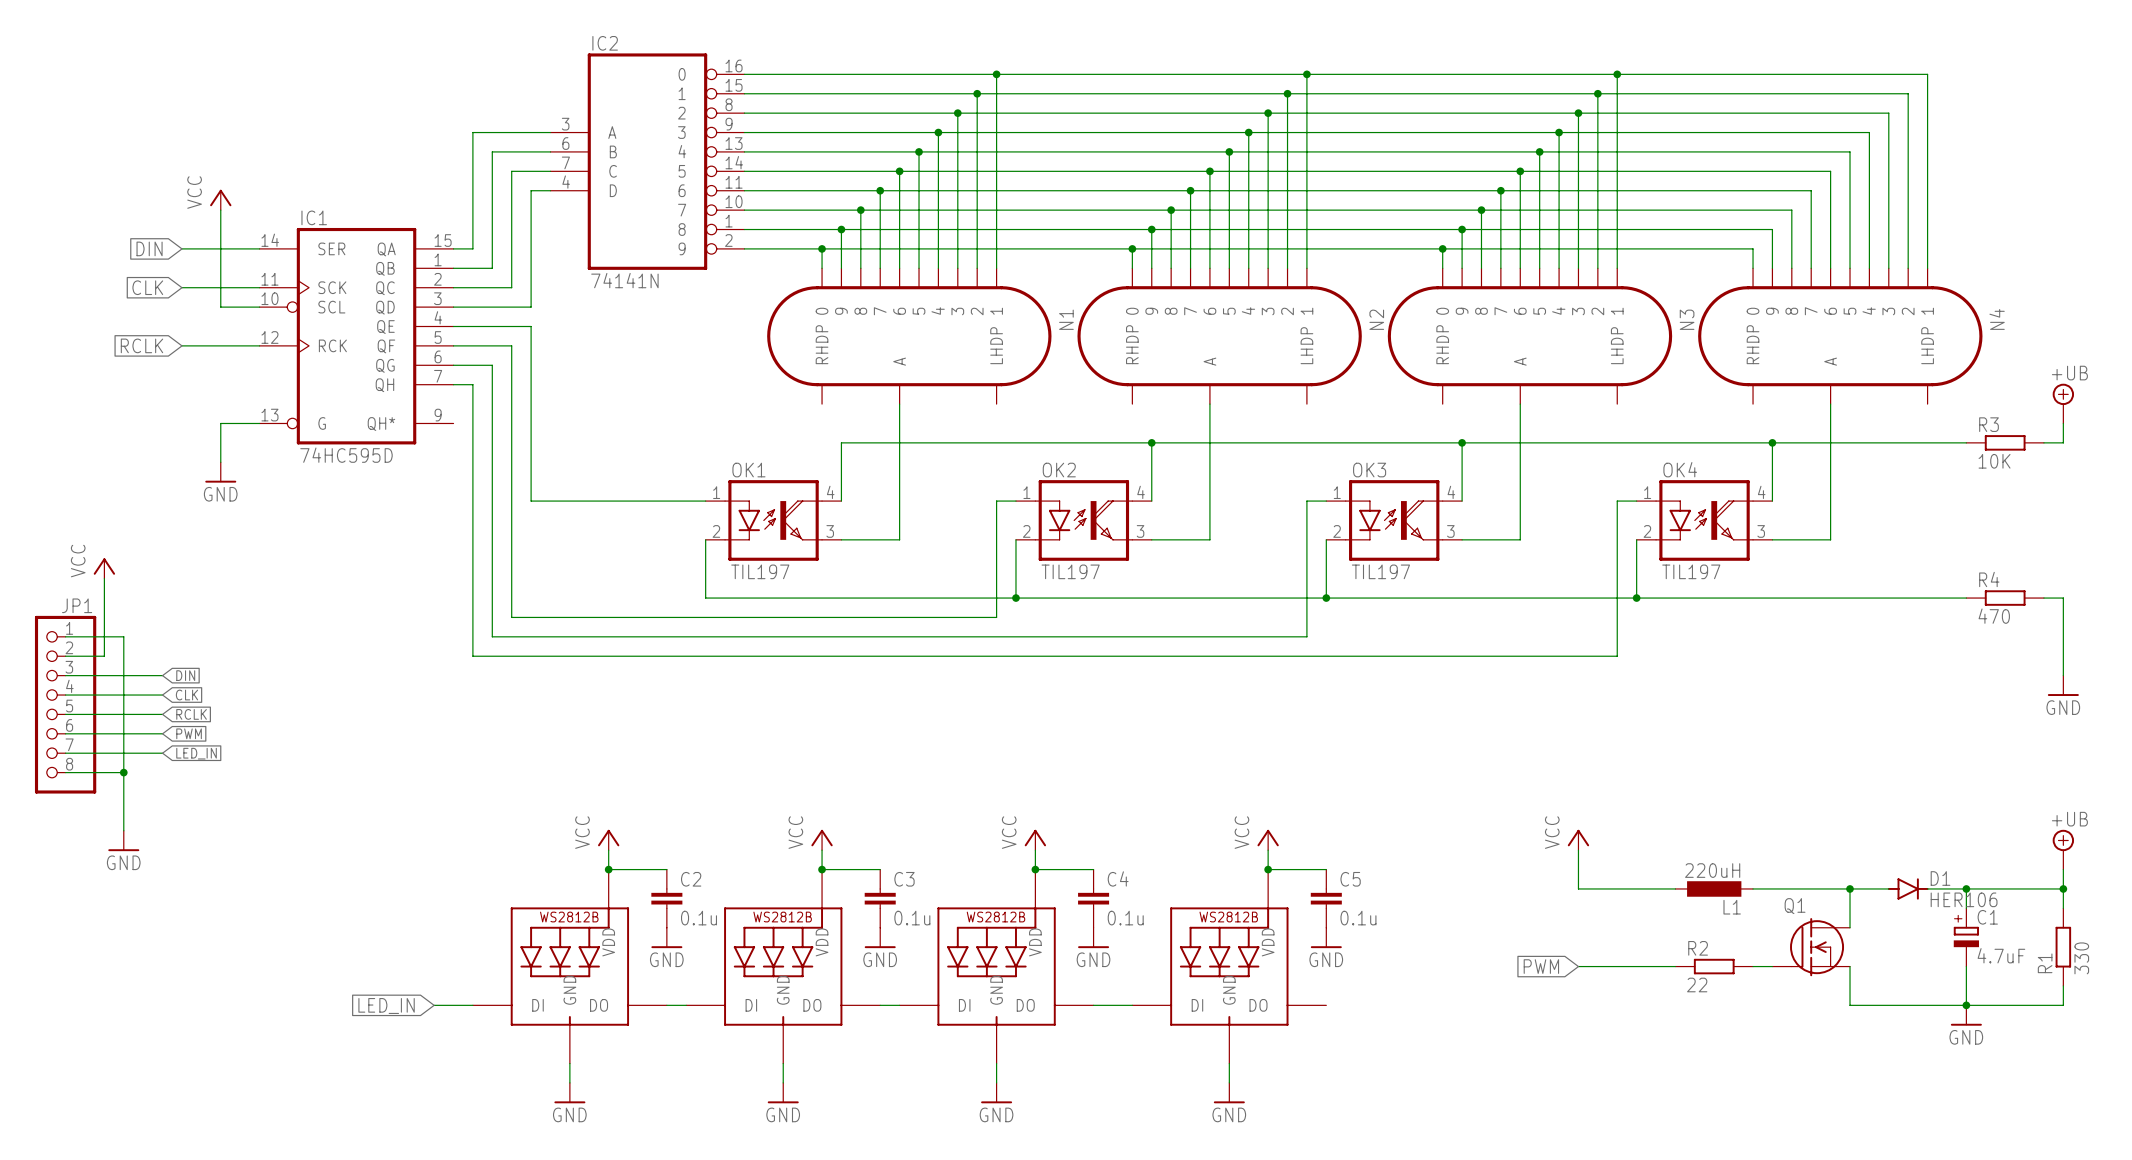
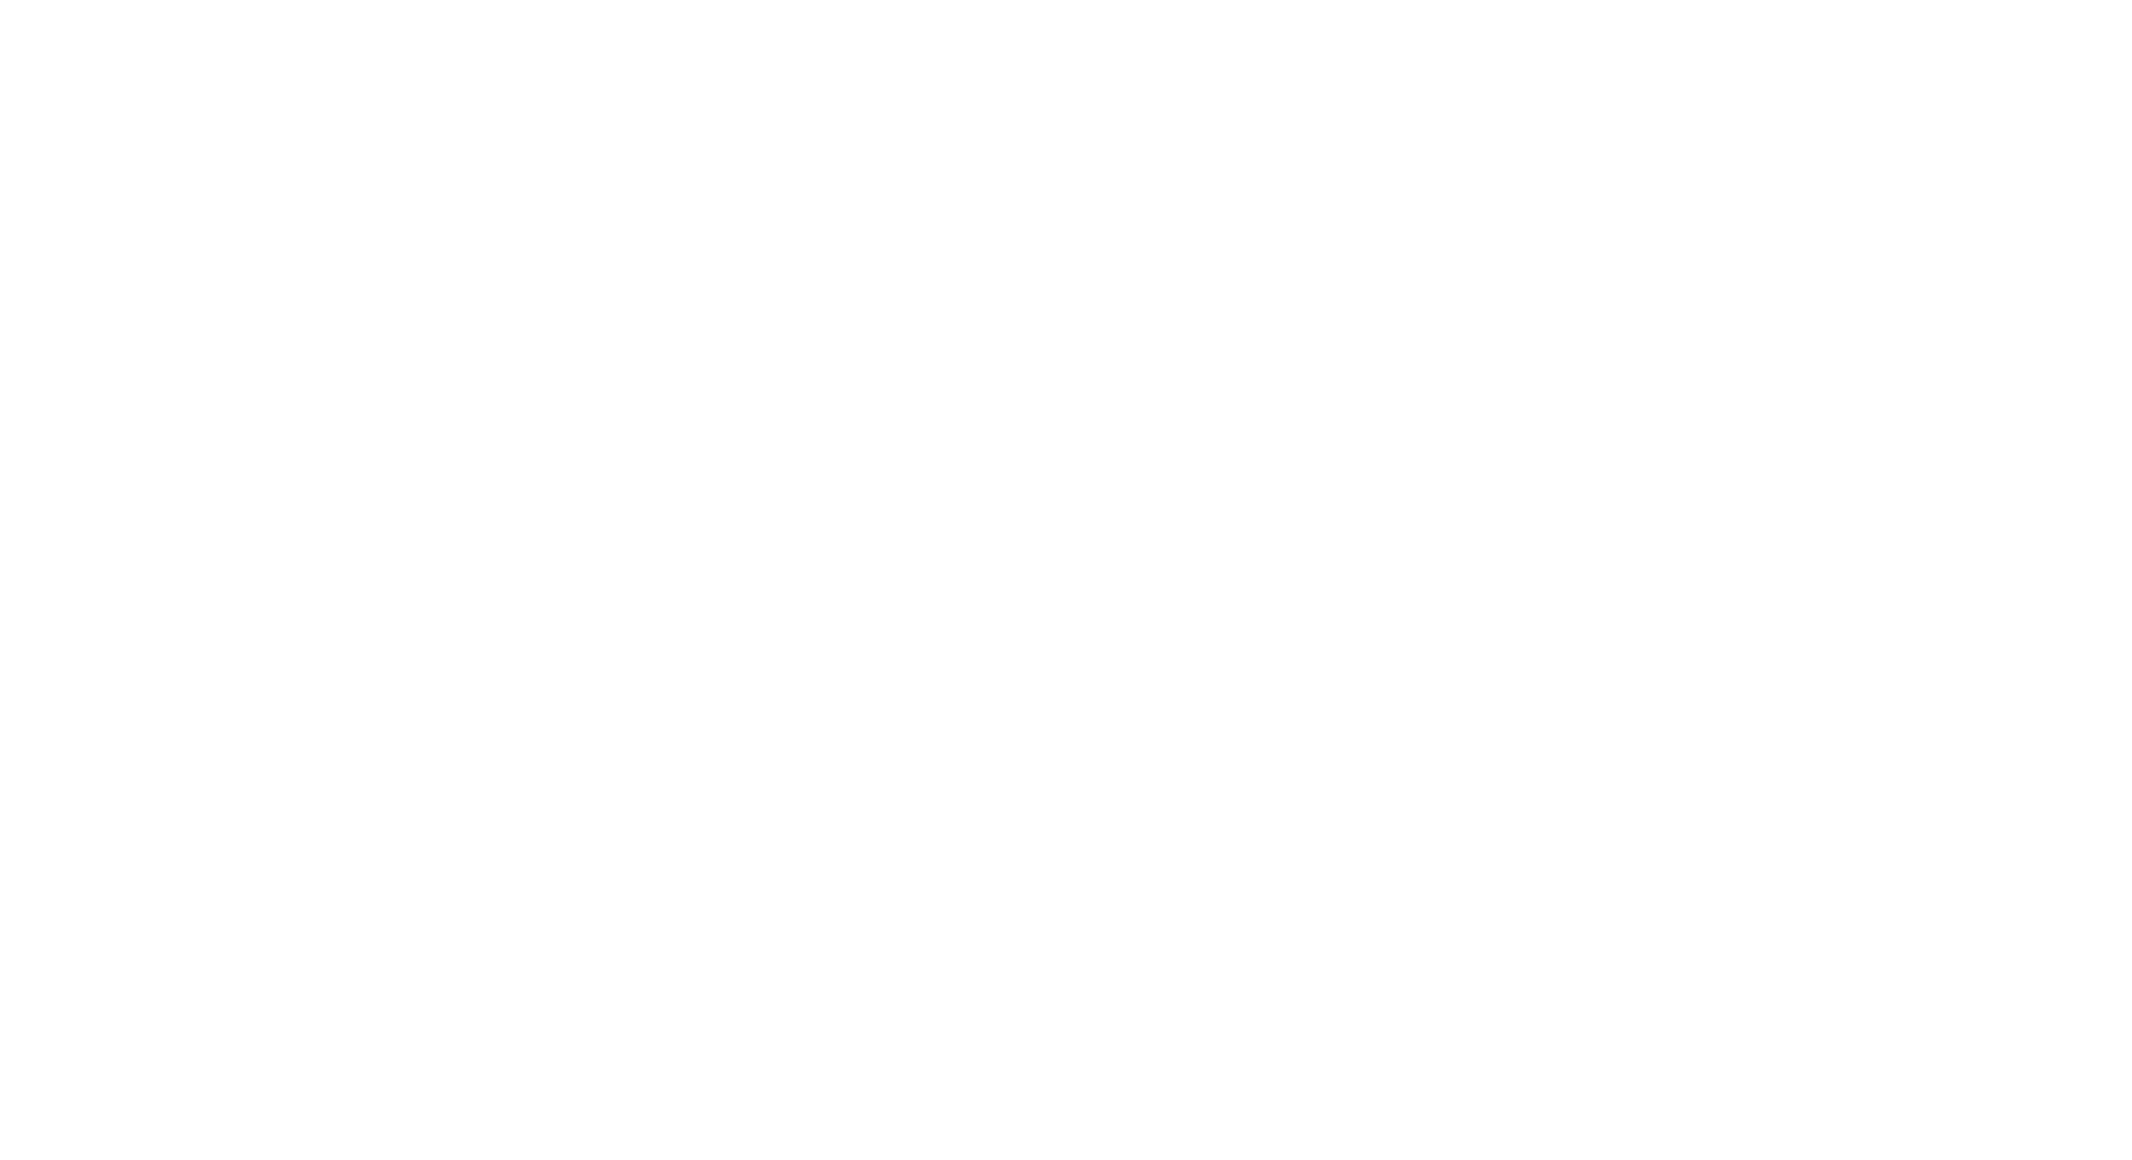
wire: (744, 74) (1927, 74) (1927, 268) -> none
wire: (996, 74) (996, 268) -> none
junction: (996, 74) -> none
wire: (1306, 74) (1306, 268) -> none
junction: (1306, 74) -> none
wire: (1617, 74) (1617, 268) -> none
junction: (1617, 74) -> none
wire: (744, 93) (1908, 93) (1908, 268) -> none
wire: (977, 93) (977, 268) -> none
junction: (977, 93) -> none
wire: (1287, 93) (1287, 268) -> none
junction: (1287, 93) -> none
wire: (1597, 93) (1597, 268) -> none
junction: (1597, 93) -> none
wire: (744, 113) (1888, 113) (1888, 268) -> none
wire: (957, 113) (957, 268) -> none
junction: (957, 113) -> none
wire: (1268, 113) (1268, 268) -> none
junction: (1268, 113) -> none
wire: (1578, 113) (1578, 268) -> none
junction: (1578, 113) -> none
wire: (550, 132) (472, 132) (472, 248) (453, 248) -> none
wire: (744, 132) (1869, 132) (1869, 268) -> none
wire: (938, 132) (938, 268) -> none
junction: (938, 132) -> none
wire: (1248, 132) (1248, 268) -> none
junction: (1248, 132) -> none
wire: (1559, 132) (1559, 268) -> none
junction: (1559, 132) -> none
wire: (550, 151) (492, 151) (492, 268) (453, 268) -> none
wire: (744, 151) (1850, 151) (1850, 268) -> none
wire: (919, 151) (919, 268) -> none
junction: (919, 151) -> none
wire: (1229, 151) (1229, 268) -> none
junction: (1229, 151) -> none
wire: (1539, 151) (1539, 268) -> none
junction: (1539, 151) -> none
IC2: 74141N (647, 161) -> none
wire: (550, 171) (511, 171) (511, 287) (453, 287) -> none
wire: (744, 171) (1830, 171) (1830, 268) -> none
wire: (899, 171) (899, 268) -> none
junction: (899, 171) -> none
wire: (1209, 171) (1209, 268) -> none
junction: (1209, 171) -> none
wire: (1520, 171) (1520, 268) -> none
junction: (1520, 171) -> none
wire: (550, 190) (531, 190) (531, 307) (453, 307) -> none
wire: (744, 190) (1811, 190) (1811, 268) -> none
wire: (880, 190) (880, 268) -> none
junction: (880, 190) -> none
wire: (1190, 190) (1190, 268) -> none
junction: (1190, 190) -> none
wire: (1500, 190) (1500, 268) -> none
junction: (1500, 190) -> none
power symbol: VCC (220, 199) -> none
wire: (220, 210) (220, 307) (259, 307) -> none
wire: (744, 210) (1791, 210) (1791, 268) -> none
wire: (860, 210) (860, 268) -> none
junction: (860, 210) -> none
wire: (1171, 210) (1171, 268) -> none
junction: (1171, 210) -> none
wire: (1481, 210) (1481, 268) -> none
junction: (1481, 210) -> none
wire: (744, 229) (1772, 229) (1772, 268) -> none
wire: (841, 229) (841, 268) -> none
junction: (841, 229) -> none
wire: (1151, 229) (1151, 268) -> none
junction: (1151, 229) -> none
wire: (1462, 229) (1462, 268) -> none
junction: (1462, 229) -> none
global label: DIN (149, 248) -> none
wire: (181, 248) (259, 248) -> none
wire: (744, 248) (1753, 248) (1753, 268) -> none
wire: (822, 248) (822, 268) -> none
junction: (822, 248) -> none
wire: (1132, 248) (1132, 268) -> none
junction: (1132, 248) -> none
wire: (1442, 248) (1442, 268) -> none
junction: (1442, 248) -> none
global label: CLK (147, 287) -> none
wire: (181, 287) (259, 287) -> none
wire: (453, 326) (531, 326) (531, 501) (705, 501) -> none
IC1: 74HC595D (356, 336) -> none
N1: (909, 336) -> none
N2: (1219, 336) -> none
N3: (1529, 336) -> none
N4: (1840, 336) -> none
global label: RCLK (141, 345) -> none
wire: (181, 345) (259, 345) -> none
wire: (453, 345) (511, 345) (511, 617) (996, 617) (996, 501) (1015, 501) -> none
wire: (453, 365) (492, 365) (492, 636) (1306, 636) (1306, 501) (1326, 501) -> none
wire: (453, 384) (472, 384) (472, 656) (1617, 656) (1617, 501) (1636, 501) -> none
power symbol: +UB (2063, 403) -> none
wire: (899, 404) (899, 539) (841, 539) -> none
wire: (1209, 404) (1209, 539) (1151, 539) -> none
wire: (1520, 404) (1520, 539) (1462, 539) -> none
wire: (1830, 404) (1830, 539) (1772, 539) -> none
wire: (259, 423) (220, 423) (220, 462) -> none
wire: (2063, 423) (2063, 442) (2043, 442) -> none
wire: (1151, 442) (1151, 501) -> none
junction: (1151, 442) -> none
wire: (1462, 442) (1462, 501) -> none
junction: (1462, 442) -> none
wire: (1772, 442) (1772, 501) -> none
junction: (1772, 442) -> none
wire: (1966, 442) (841, 442) (841, 501) -> none
R3: 10K (2005, 442) -> none
power symbol: GND (220, 472) -> none
OK1: TIL197 (773, 520) -> none
OK2: TIL197 (1083, 520) -> none
OK3: TIL197 (1394, 520) -> none
OK4: TIL197 (1704, 520) -> none
wire: (705, 539) (705, 598) (1966, 598) -> none
wire: (1015, 539) (1015, 598) -> none
wire: (1326, 539) (1326, 598) -> none
wire: (1636, 539) (1636, 598) -> none
power symbol: VCC (104, 568) -> none
wire: (104, 578) (104, 656) (65, 656) -> none
junction: (1015, 598) -> none
junction: (1326, 598) -> none
junction: (1636, 598) -> none
R4: 470 (2005, 598) -> none
wire: (2043, 598) (2063, 598) (2063, 675) -> none
wire: (65, 636) (123, 636) (123, 830) -> none
wire: (65, 675) (162, 675) -> none
global label: DIN (185, 675) -> none
power symbol: GND (2063, 685) -> none
wire: (65, 695) (162, 695) -> none
global label: CLK (186, 695) -> none
JP1: (65, 704) -> none
wire: (65, 714) (162, 714) -> none
global label: RCLK (191, 714) -> none
wire: (65, 733) (162, 733) -> none
global label: PWM (189, 733) -> none
wire: (65, 753) (162, 753) -> none
global label: LED_IN (196, 753) -> none
wire: (65, 772) (123, 772) -> none
junction: (123, 772) -> none
power symbol: GND (123, 840) -> none
power symbol: VCC (608, 840) -> none
power symbol: VCC (822, 840) -> none
power symbol: VCC (1035, 840) -> none
power symbol: VCC (1268, 840) -> none
power symbol: VCC (1578, 840) -> none
power symbol: +UB (2063, 849) -> none
wire: (608, 850) (608, 869) (666, 869) -> none
wire: (822, 850) (822, 869) (880, 869) -> none
wire: (1035, 850) (1035, 869) (1093, 869) -> none
wire: (1268, 850) (1268, 869) (1326, 869) -> none
wire: (1578, 850) (1578, 888) (1675, 888) -> none
junction: (608, 869) -> none
junction: (822, 869) -> none
junction: (1035, 869) -> none
junction: (1268, 869) -> none
wire: (2063, 869) (2063, 908) -> none
L1: 220uH (1714, 888) -> none
wire: (1753, 888) (1888, 888) -> none
wire: (1850, 888) (1850, 927) -> none
junction: (1850, 888) -> none
D1: HER106 (1908, 888) -> none
wire: (1927, 888) (2063, 888) -> none
wire: (1966, 888) (1966, 908) -> none
junction: (1966, 888) -> none
junction: (2063, 888) -> none
C2: 0.1u (666, 898) -> none
C3: 0.1u (880, 898) -> none
C4: 0.1u (1093, 898) -> none
C5: 0.1u (1326, 898) -> none
power symbol: GND (666, 937) -> none
power symbol: GND (880, 937) -> none
power symbol: GND (1093, 937) -> none
power symbol: GND (1326, 937) -> none
C1: 4.7uF (1966, 937) -> none
Q1: (1811, 947) -> none
R1: 330 (2063, 947) -> none
part: (569, 966) -> none
part: (783, 966) -> none
part: (996, 966) -> none
part: (1229, 966) -> none
global label: PWM (1541, 966) -> none
wire: (1578, 966) (1675, 966) -> none
R2: 22 (1714, 966) -> none
wire: (1753, 966) (1772, 966) -> none
wire: (1850, 966) (1850, 1005) (2063, 1005) (2063, 985) -> none
wire: (1966, 966) (1966, 1005) -> none
global label: LED_IN (386, 1005) -> none
wire: (434, 1005) (472, 1005) -> none
wire: (666, 1005) (686, 1005) -> none
wire: (880, 1005) (899, 1005) -> none
wire: (1093, 1005) (1132, 1005) -> none
junction: (1966, 1005) -> none
power symbol: GND (1966, 1015) -> none
wire: (569, 1063) (569, 1082) -> none
wire: (783, 1063) (783, 1082) -> none
wire: (996, 1063) (996, 1082) -> none
wire: (1229, 1063) (1229, 1082) -> none
power symbol: GND (569, 1093) -> none
power symbol: GND (783, 1093) -> none
power symbol: GND (996, 1093) -> none
power symbol: GND (1229, 1093) -> none

